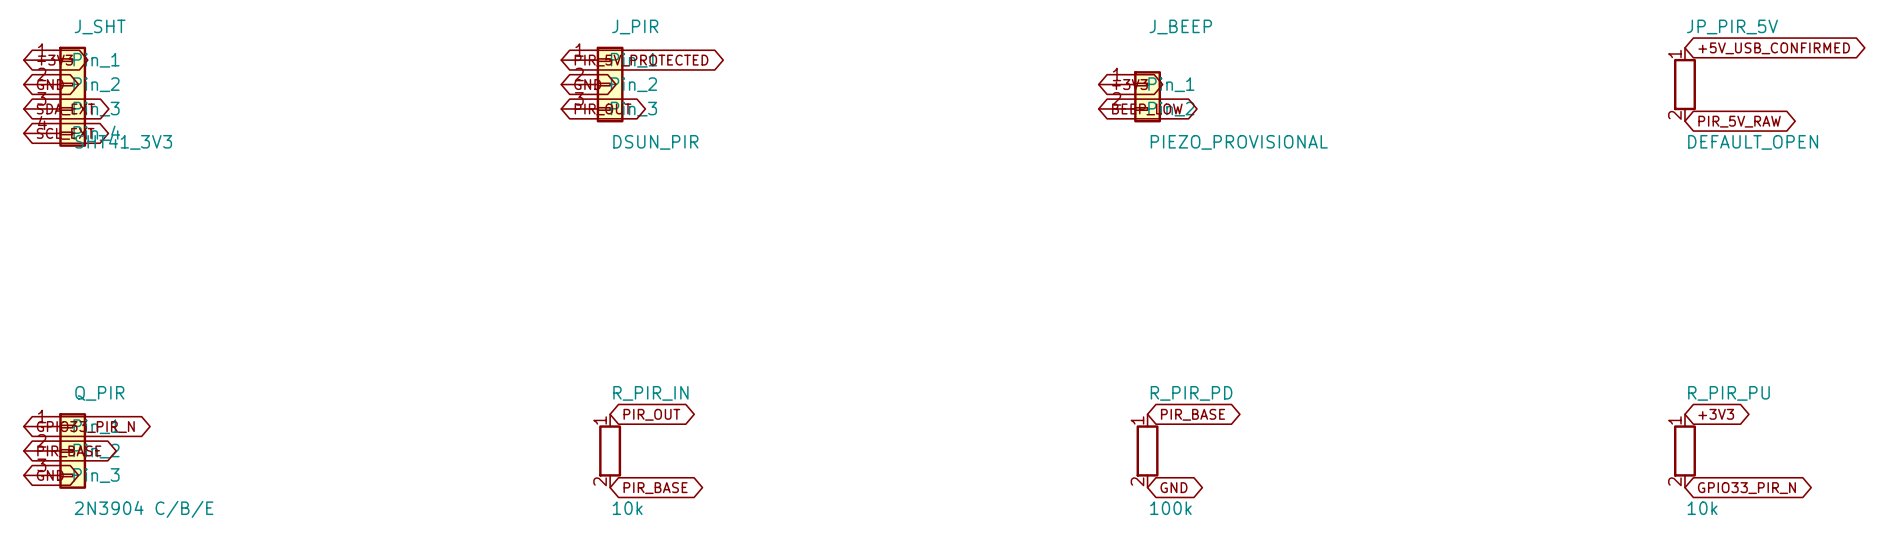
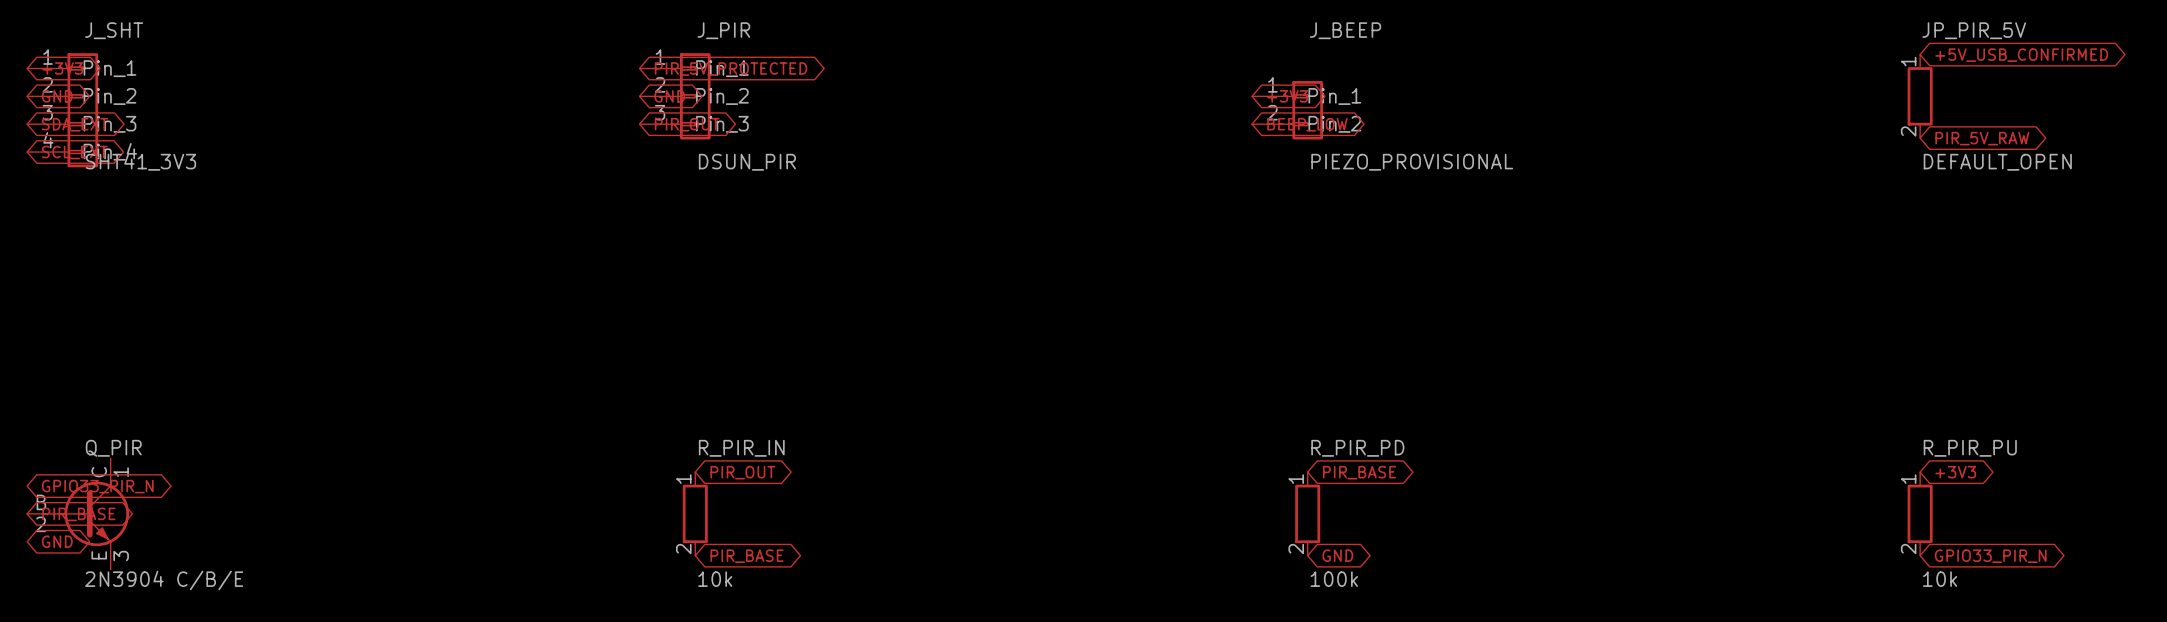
Q_PIR: 2N3904 C/B/E (54, 450) -> none
Q_PIR: none -> 2N3904 C/B/E (78, 513)

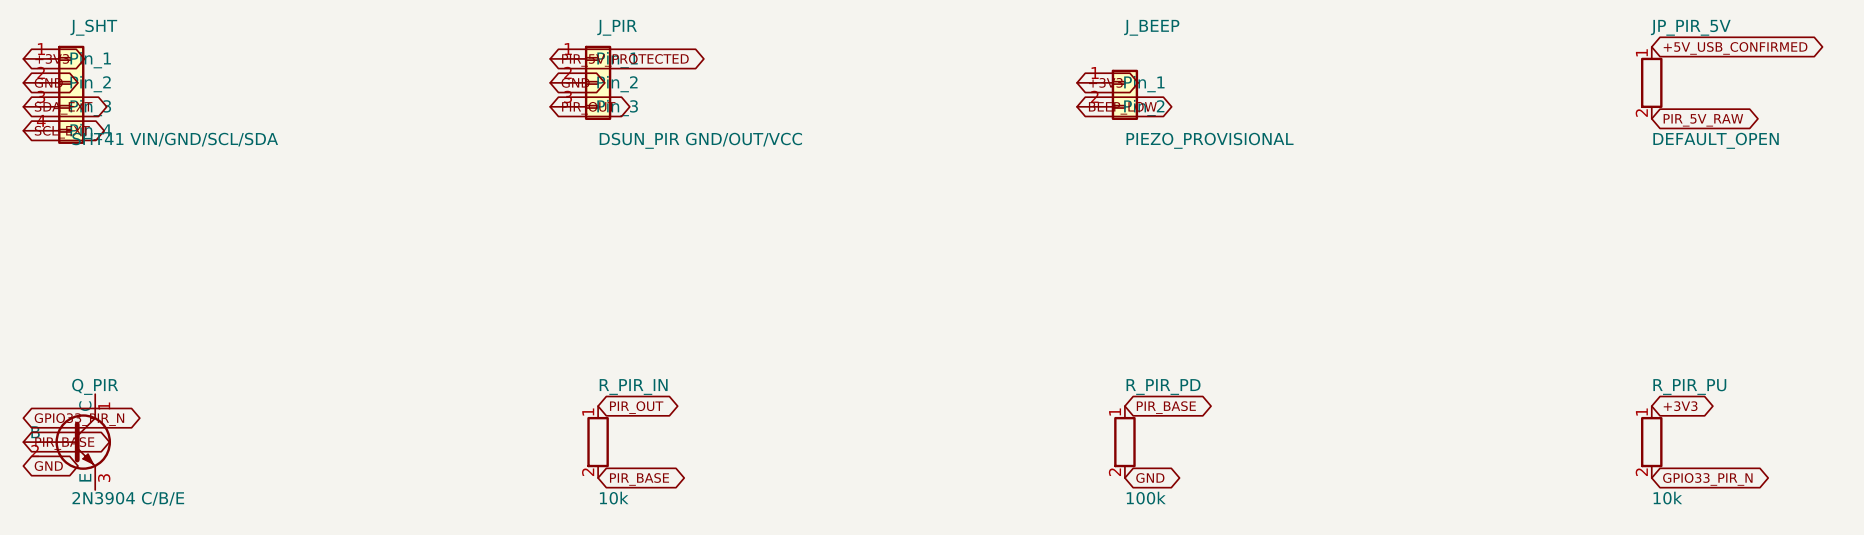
J_SHT value: SHT41_3V3 (140, 161) -> SHT41 VIN/GND/SCL/SDA (175, 139)
J_PIR value: DSUN_PIR (747, 162) -> DSUN_PIR GND/OUT/VCC (700, 140)

